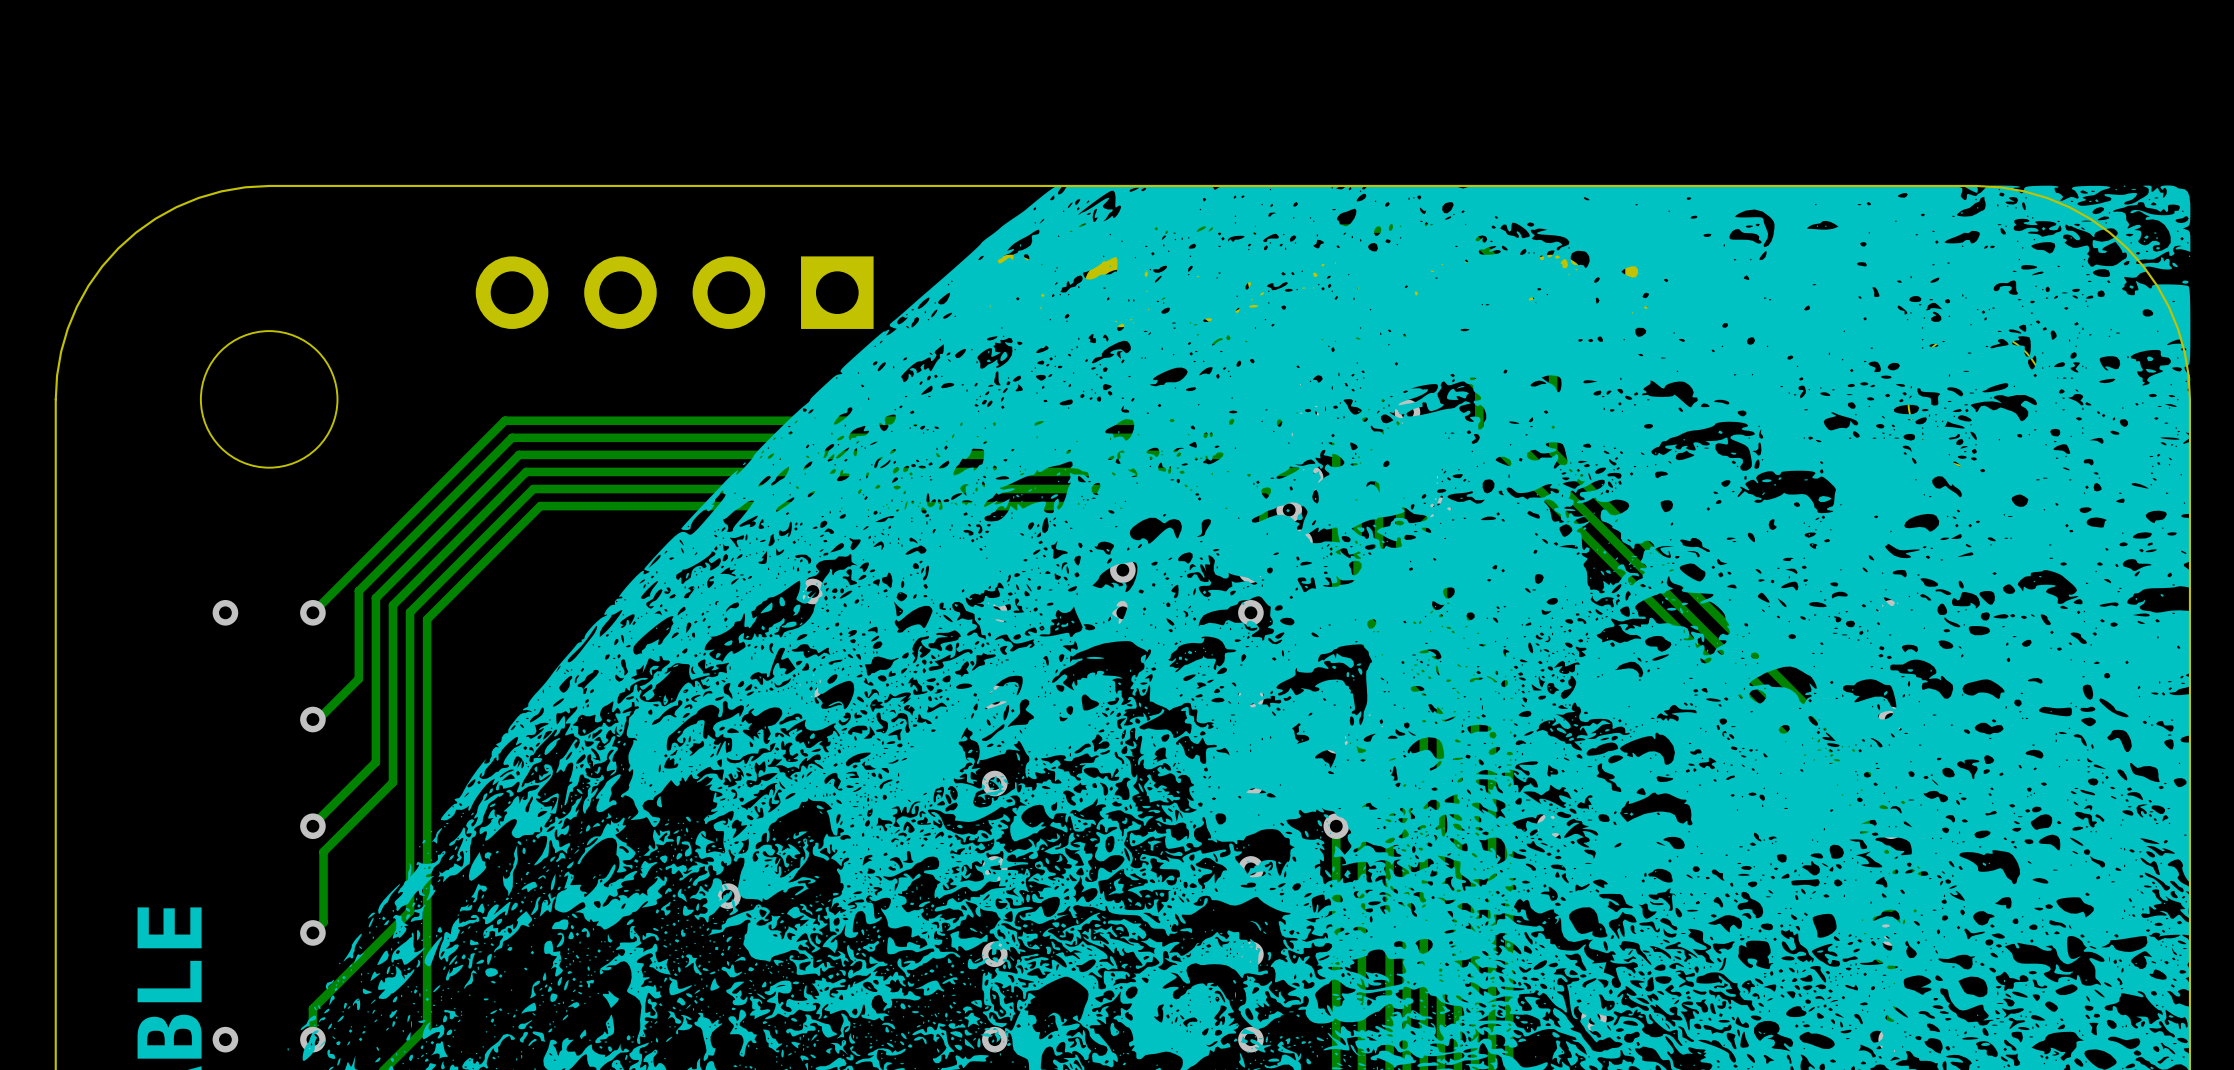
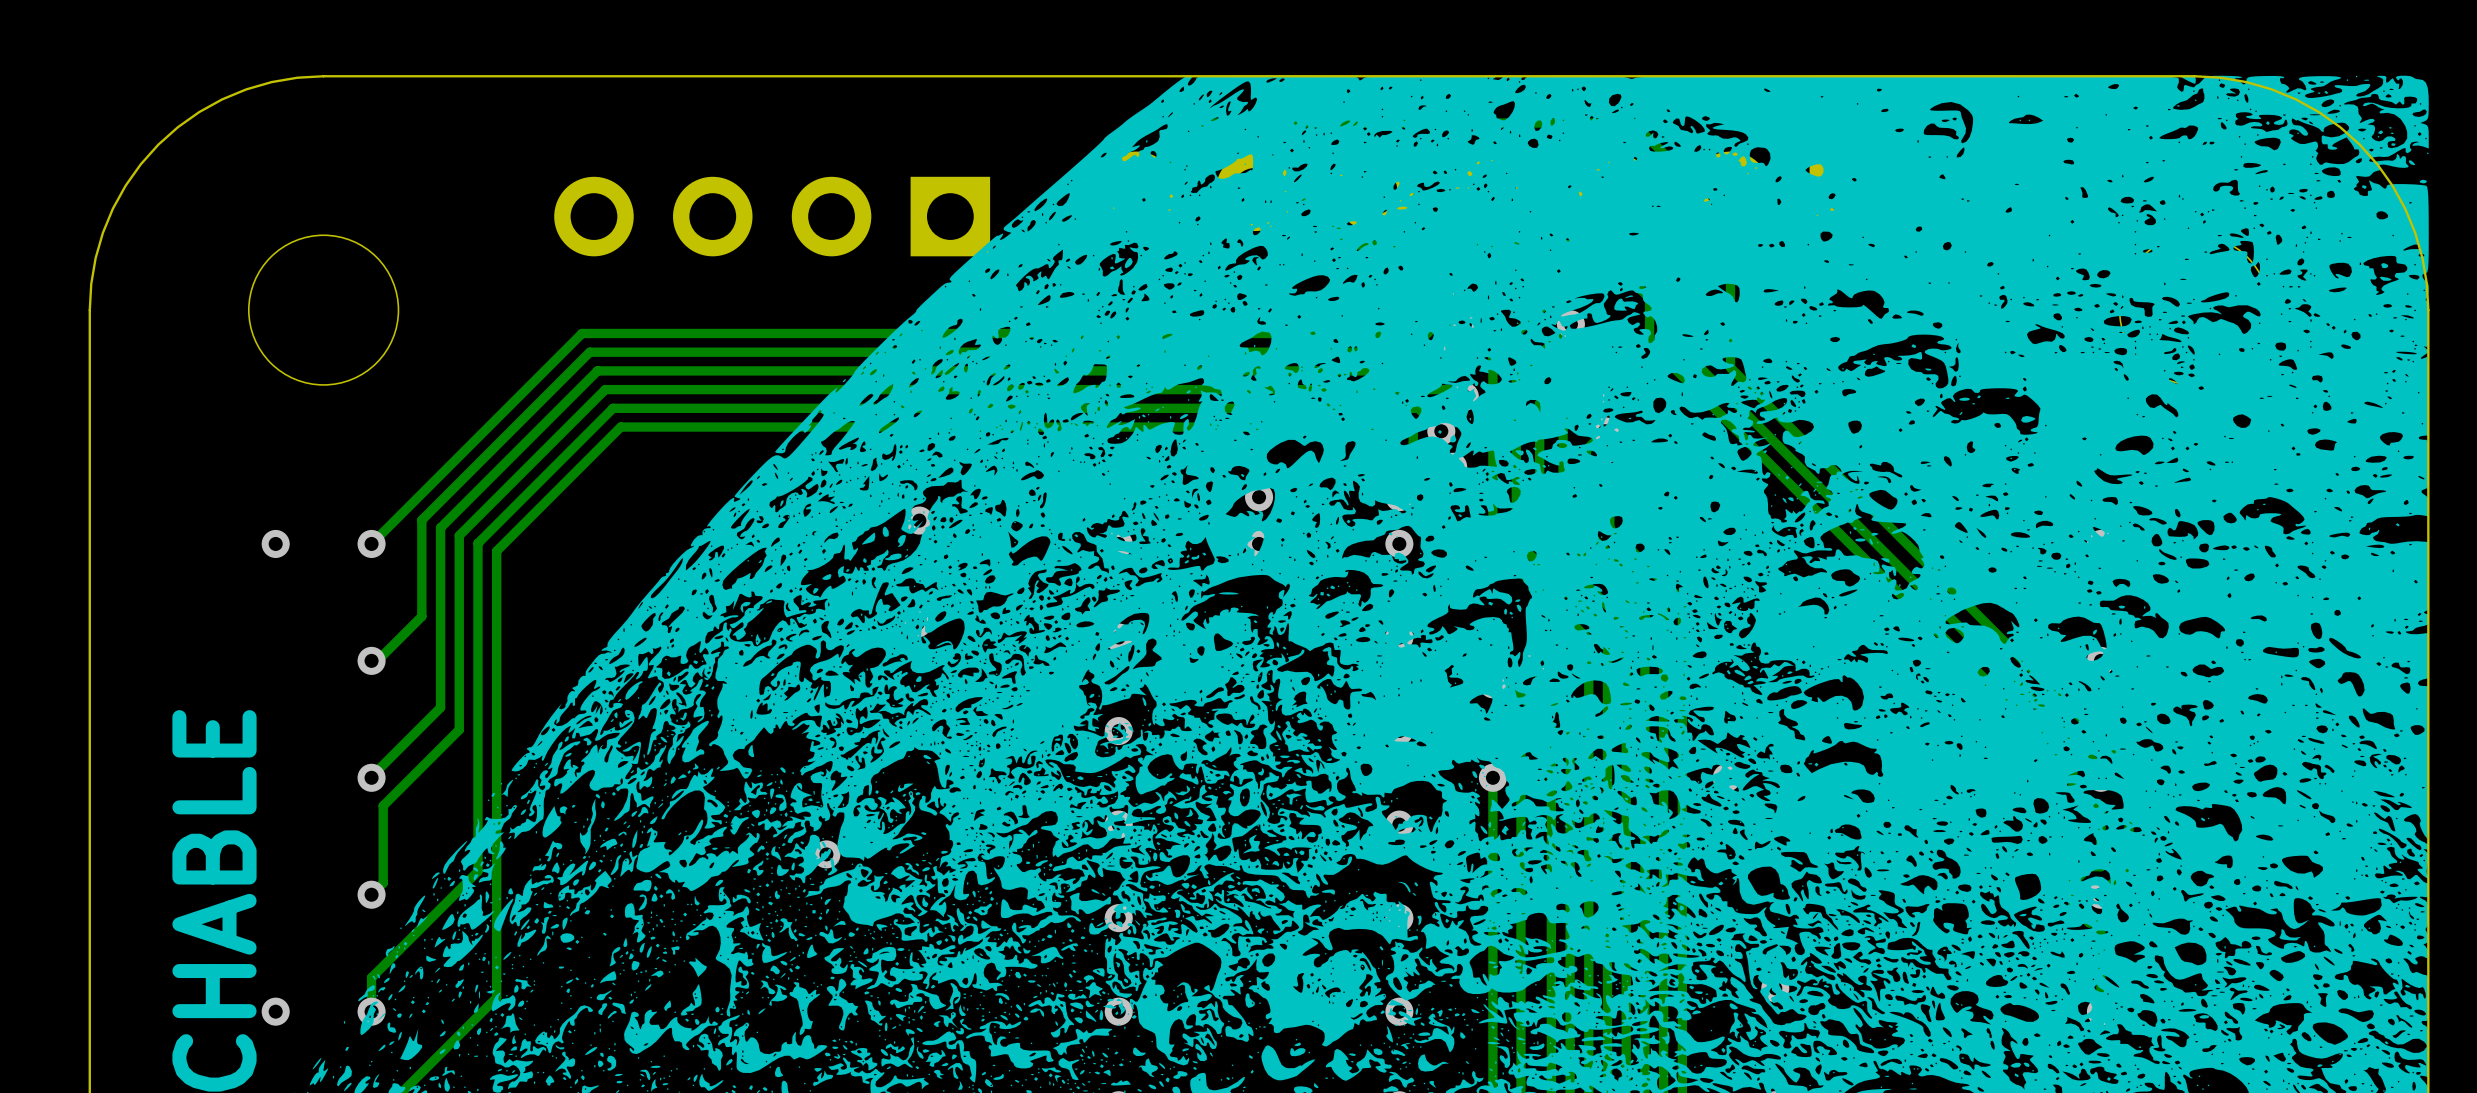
part position: (674, 292) -> (772, 216)

